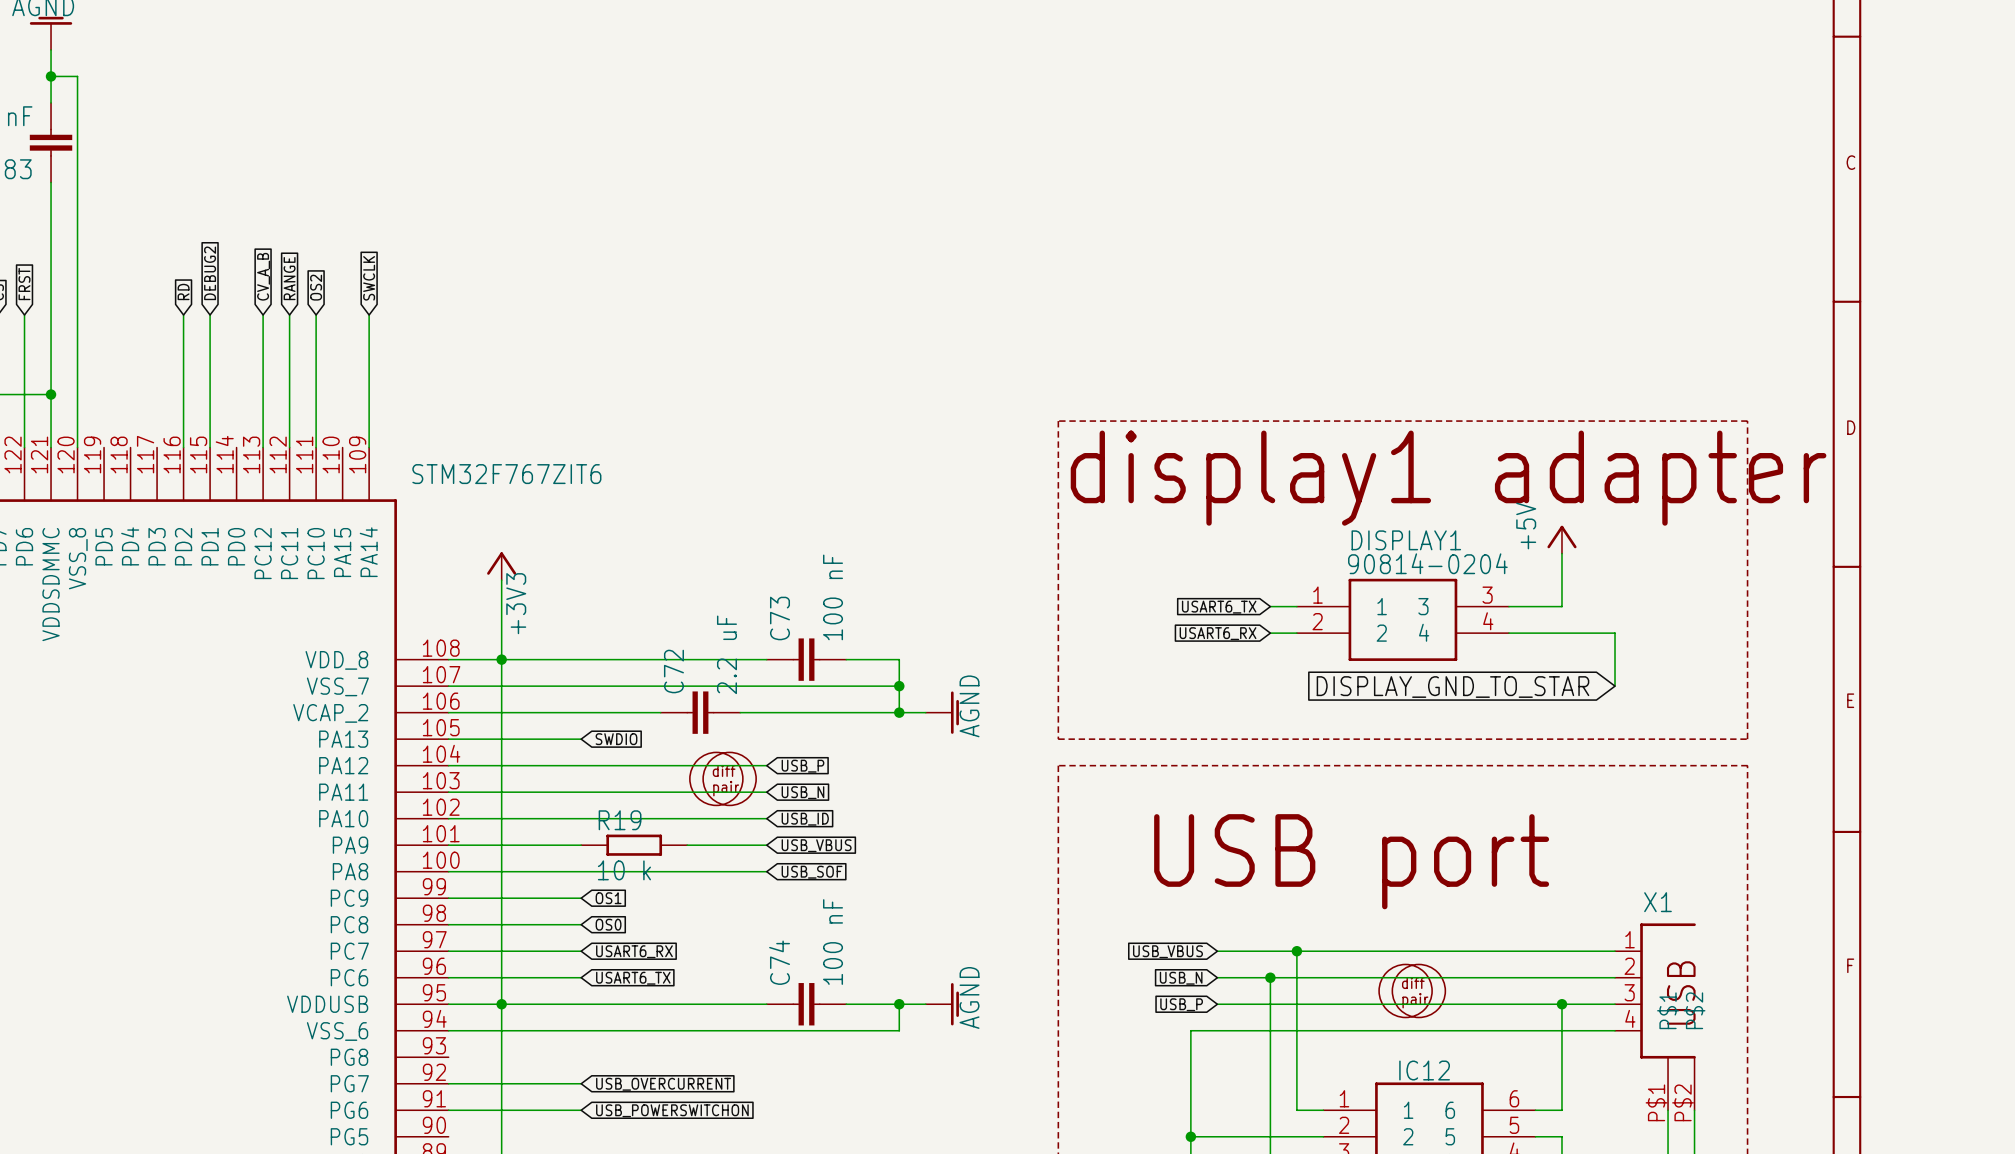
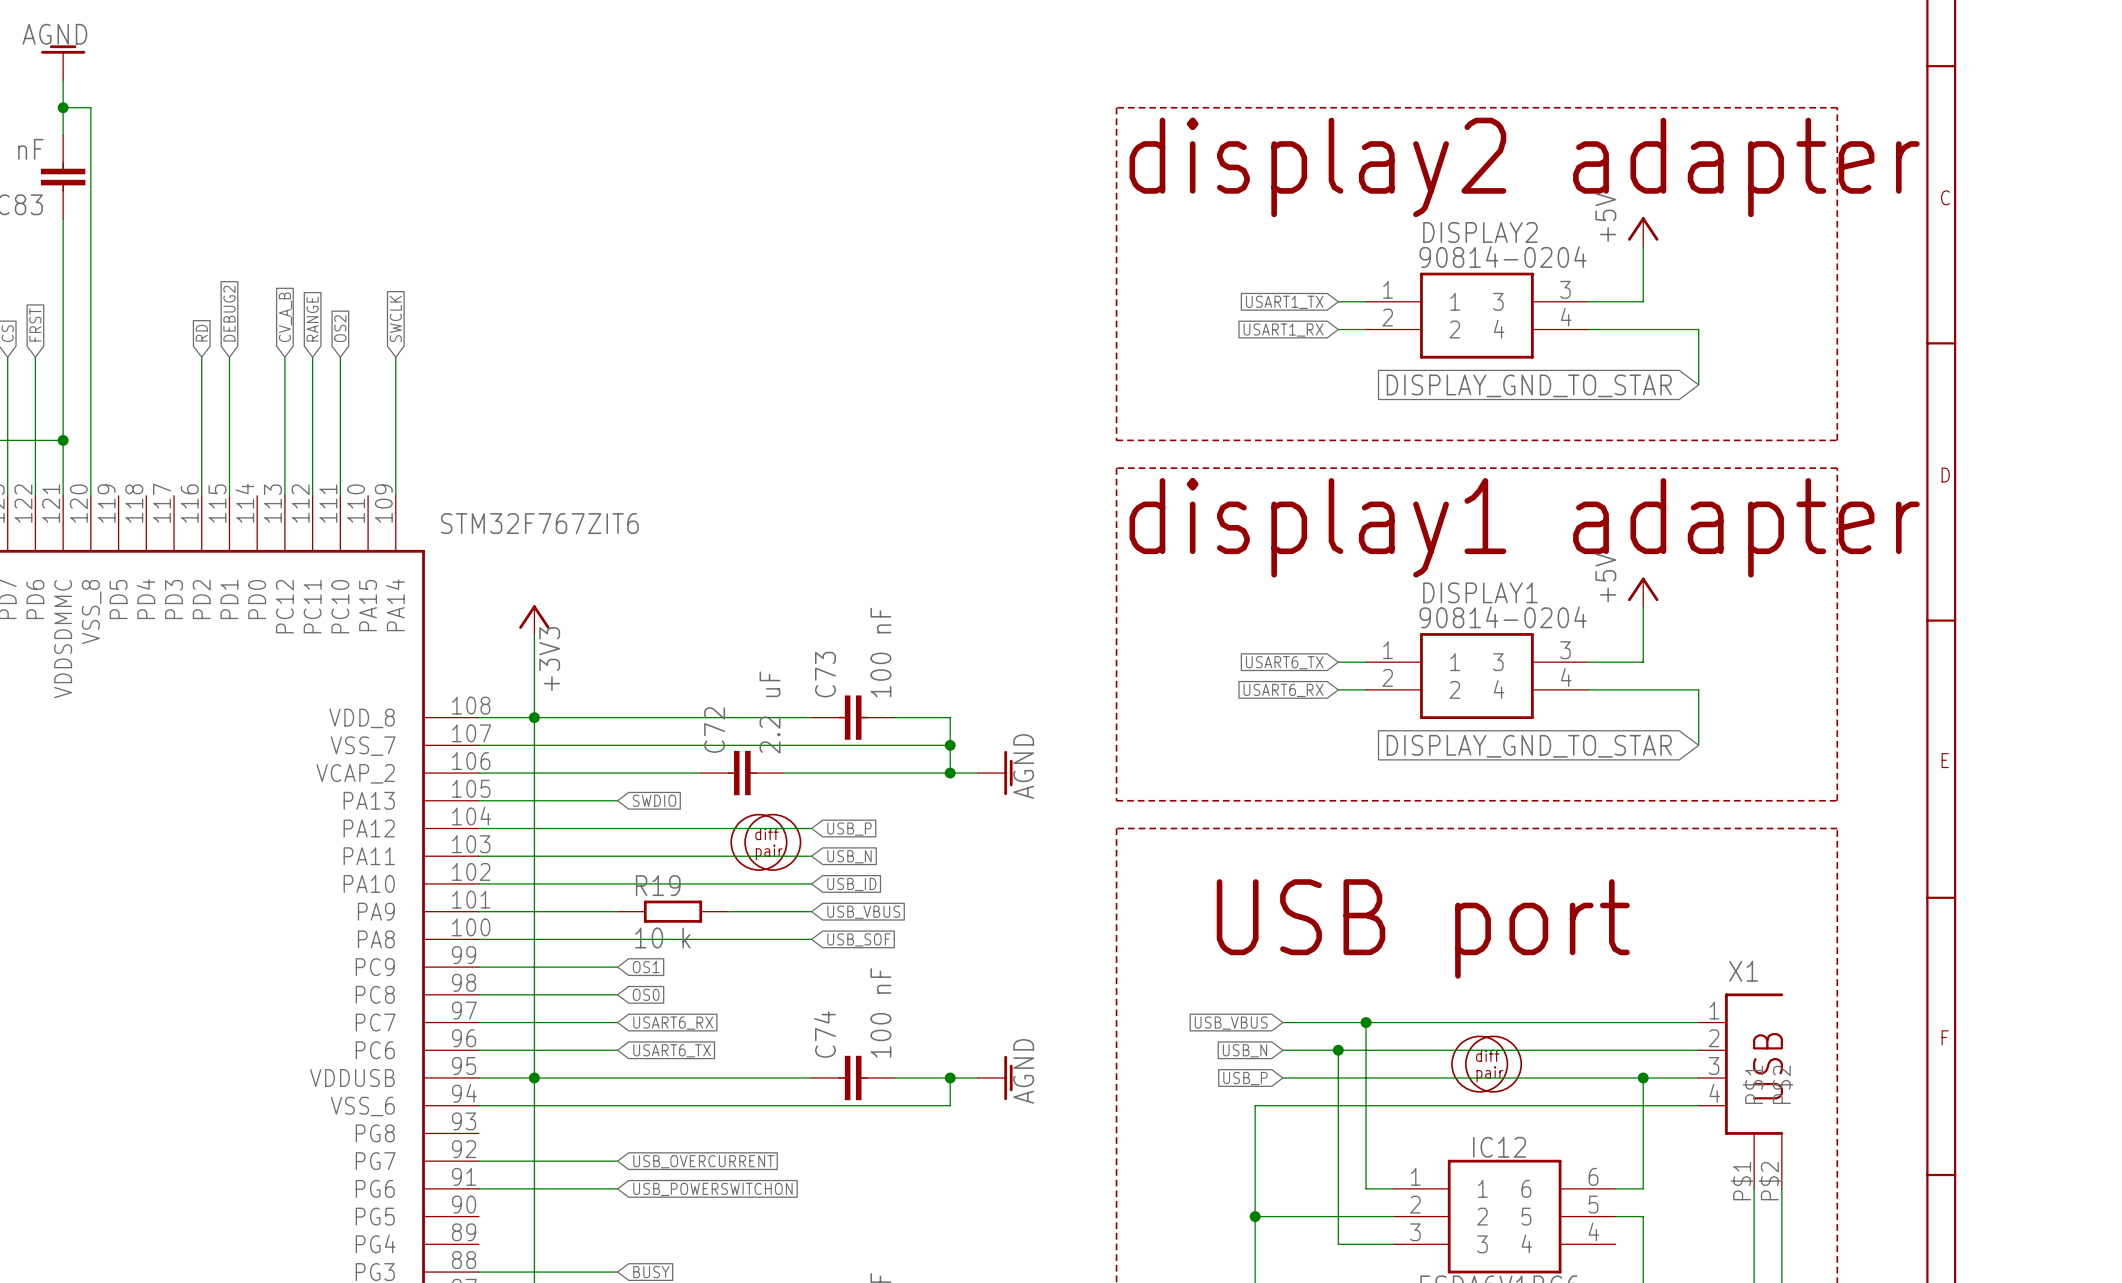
line: none -> (1116, 107) (1116, 440) (1837, 440) (1837, 107) (1116, 107)
text: none -> display2 adapter (1524, 167)
power symbol: none -> +5V (1643, 231)
wire: none -> (1643, 246) (1643, 301) (1587, 301)
global label: none -> USART1_TX (1284, 302)
wire: none -> (1338, 301) (1366, 301)
DISPLAY2: none -> 90814-0204 (1476, 315)
wire: none -> (1338, 329) (1366, 329)
wire: none -> (1587, 329) (1698, 329) (1698, 384)
global label: none -> USART1_RX (1283, 330)
global label: none -> DISPLAY_GND_TO_STAR (1529, 385)

